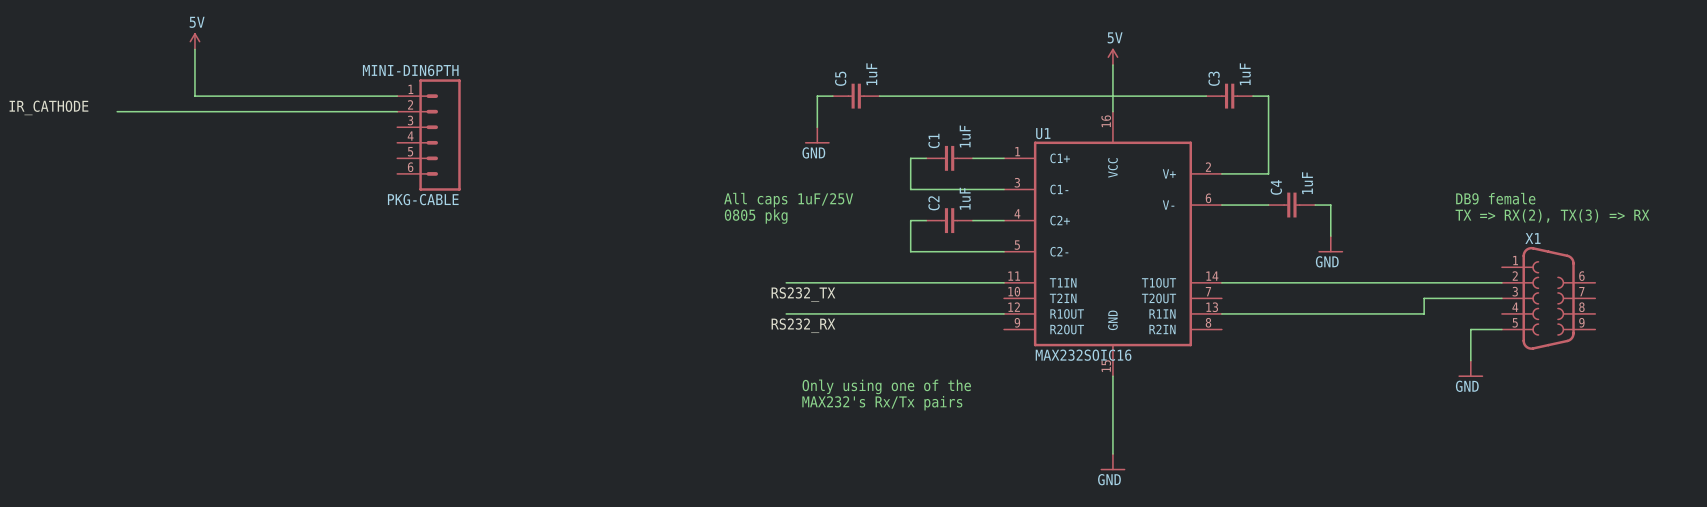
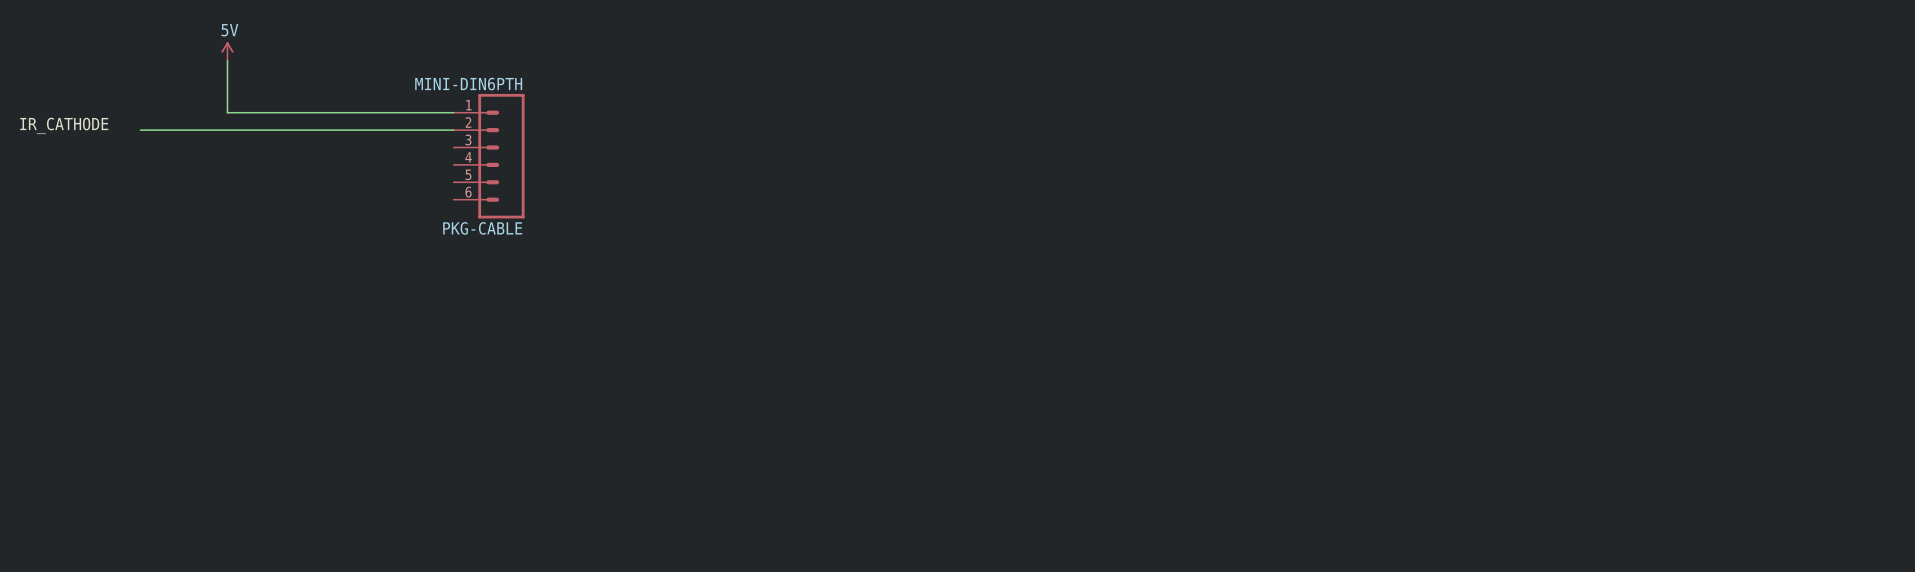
power symbol: 5V (1112, 56) -> none
wire: (1112, 65) (1112, 111) -> none
wire: (832, 96) (817, 96) (817, 127) -> none
C5: 1uF (856, 96) -> none
wire: (879, 96) (1206, 96) -> none
C3: 1uF (1229, 96) -> none
wire: (1252, 96) (1268, 96) (1268, 173) (1221, 173) -> none
power symbol: GND (817, 135) -> none
wire: (926, 158) (910, 158) (910, 189) (1004, 189) -> none
C1: 1uF (949, 158) -> none
wire: (972, 158) (1004, 158) -> none
text: DB9 female (1495, 198) -> none
text: All caps 1uF/25V (788, 200) -> none
wire: (1221, 205) (1268, 205) -> none
C4: 1uF (1291, 205) -> none
wire: (1315, 205) (1330, 205) (1330, 236) -> none
text: TX => RX(2), TX(3) => RX (1552, 215) -> none
text: 0805 pkg (756, 216) -> none
wire: (926, 220) (910, 220) (910, 251) (1004, 251) -> none
C2: 1uF (949, 220) -> none
wire: (972, 220) (1004, 220) -> none
U1: MAX232SOIC16 (1112, 243) -> none
power symbol: GND (1330, 244) -> none
wire: (786, 282) (1004, 282) -> none
wire: (1221, 282) (1501, 282) -> none
label: RS232_TX (803, 294) -> none
wire: (1501, 298) (1424, 298) (1424, 313) (1221, 313) -> none
X1: (1548, 298) -> none
wire: (786, 313) (1004, 313) -> none
label: RS232_RX (803, 325) -> none
wire: (1501, 329) (1470, 329) (1470, 360) -> none
power symbol: GND (1470, 368) -> none
wire: (1112, 376) (1112, 453) -> none
text: Only using one of the (886, 386) -> none
text: MAX232's Rx/Tx pairs (882, 403) -> none
power symbol: GND (1112, 462) -> none

